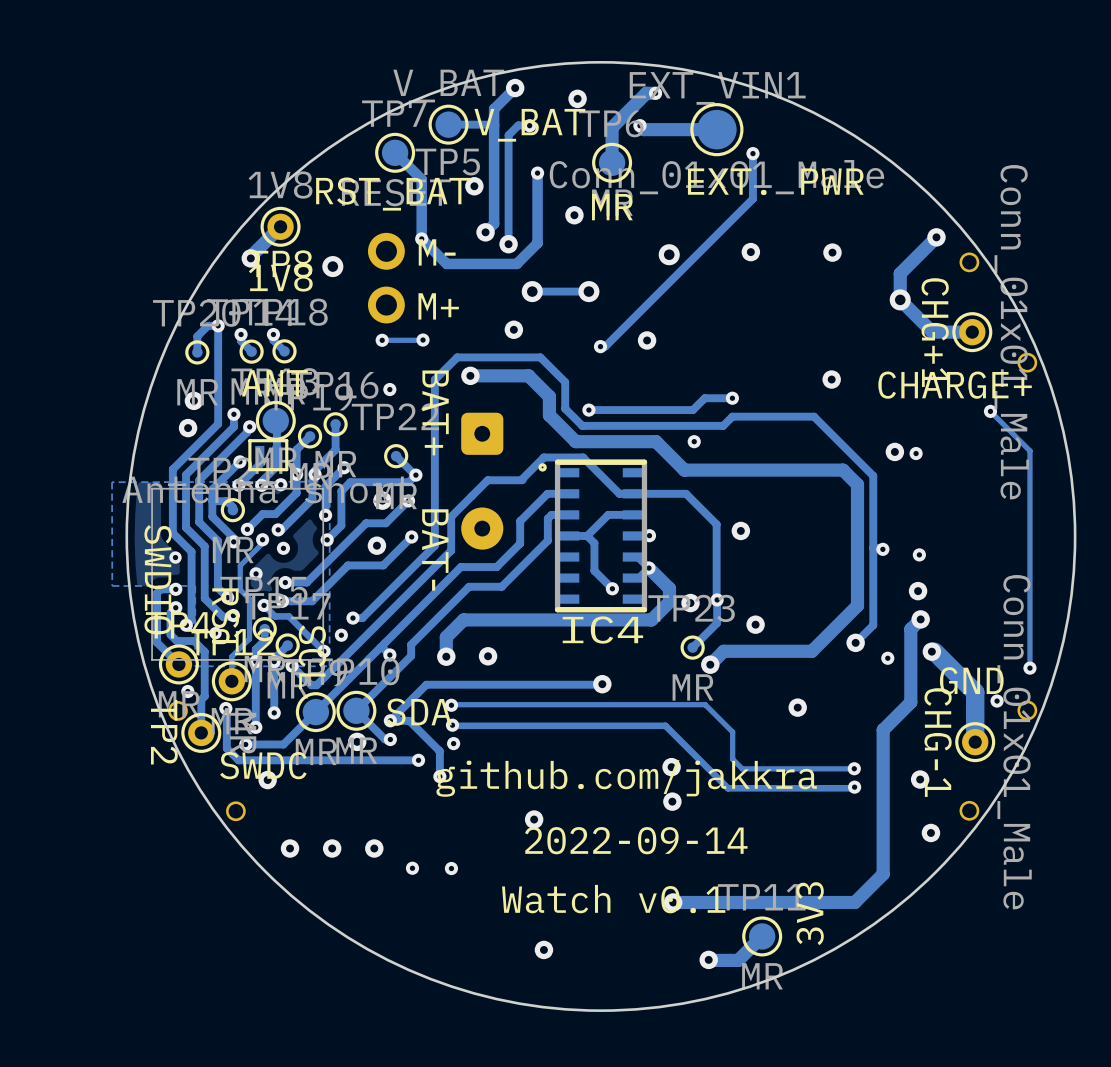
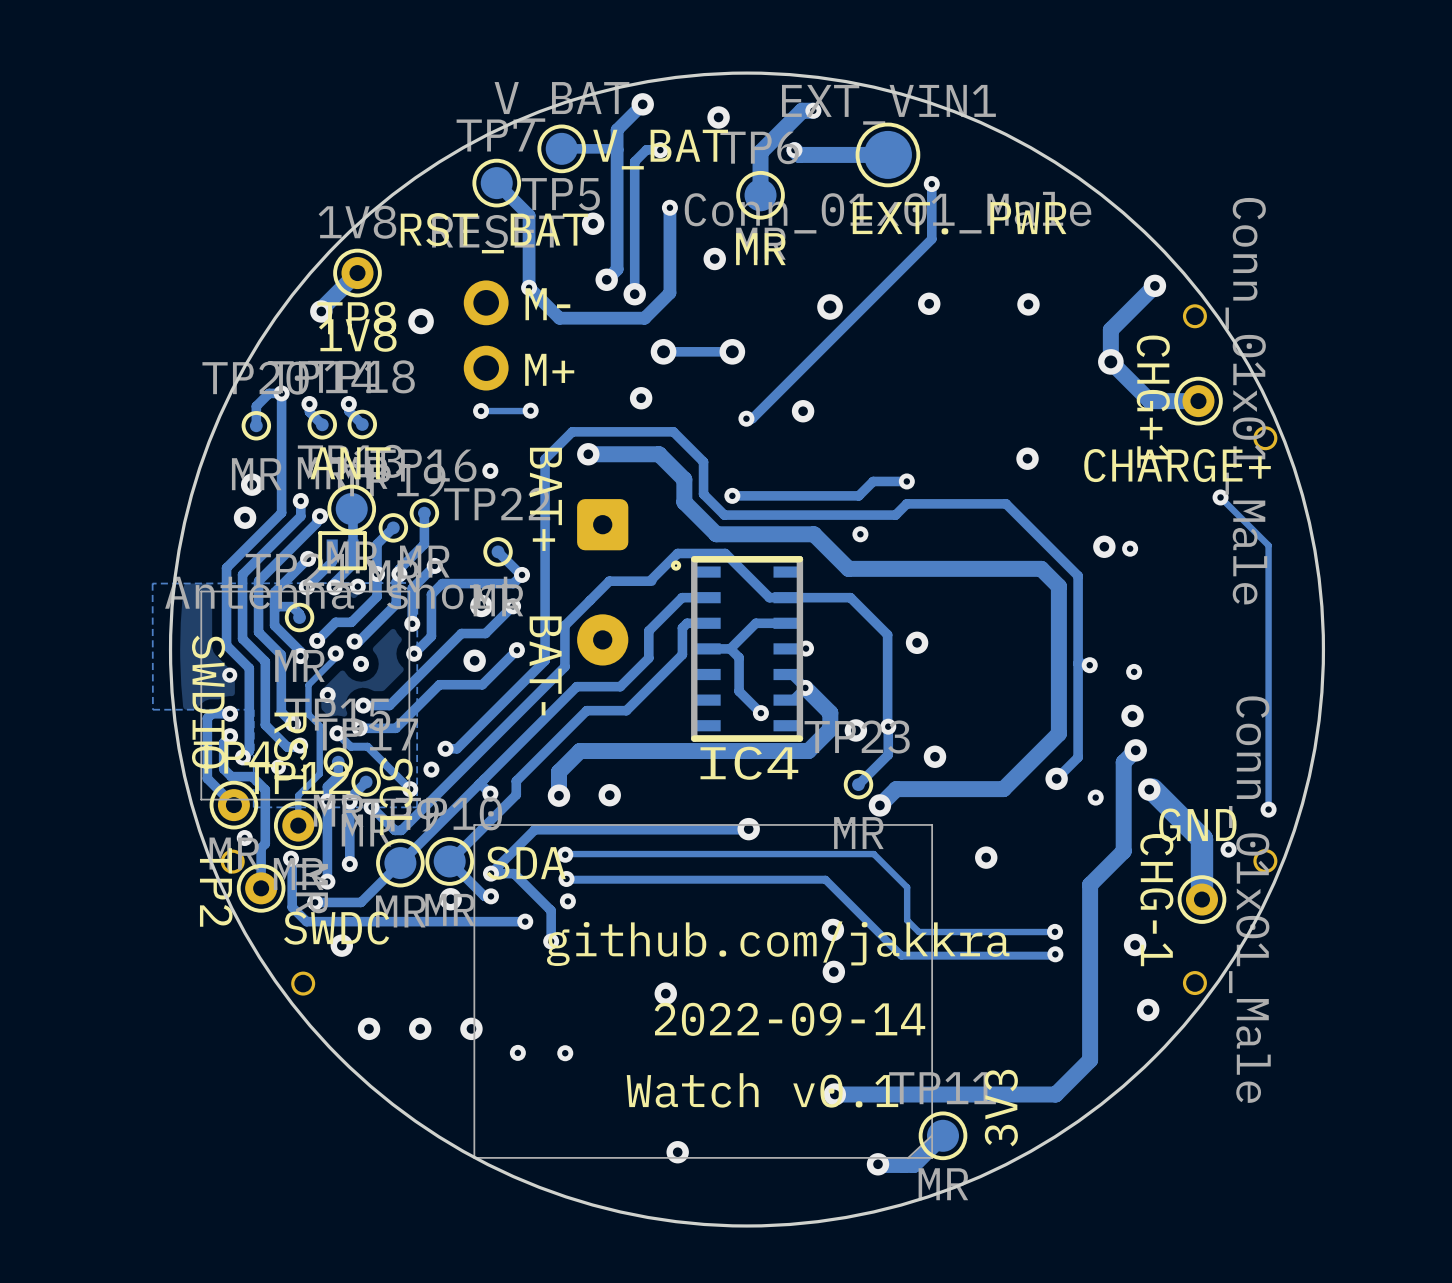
part: none -> (703, 991)

